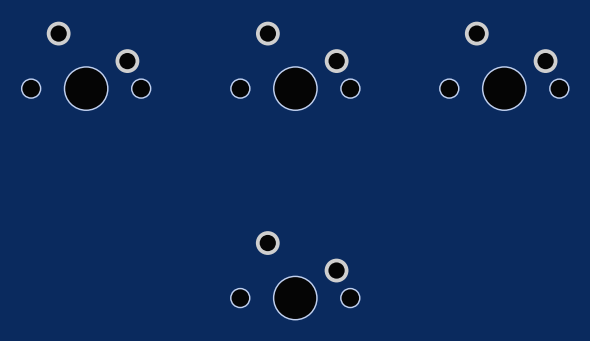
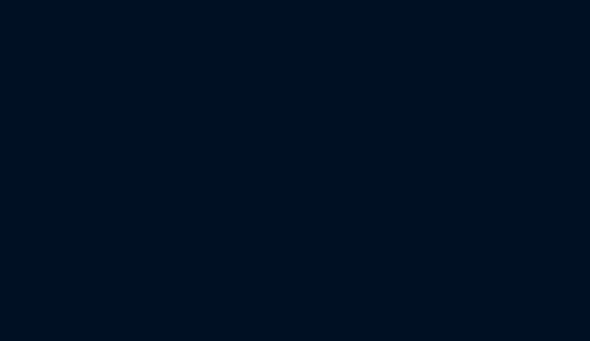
part: (86, 65) -> none
part: (295, 65) -> none
part: (504, 65) -> none
part: (295, 275) -> none

